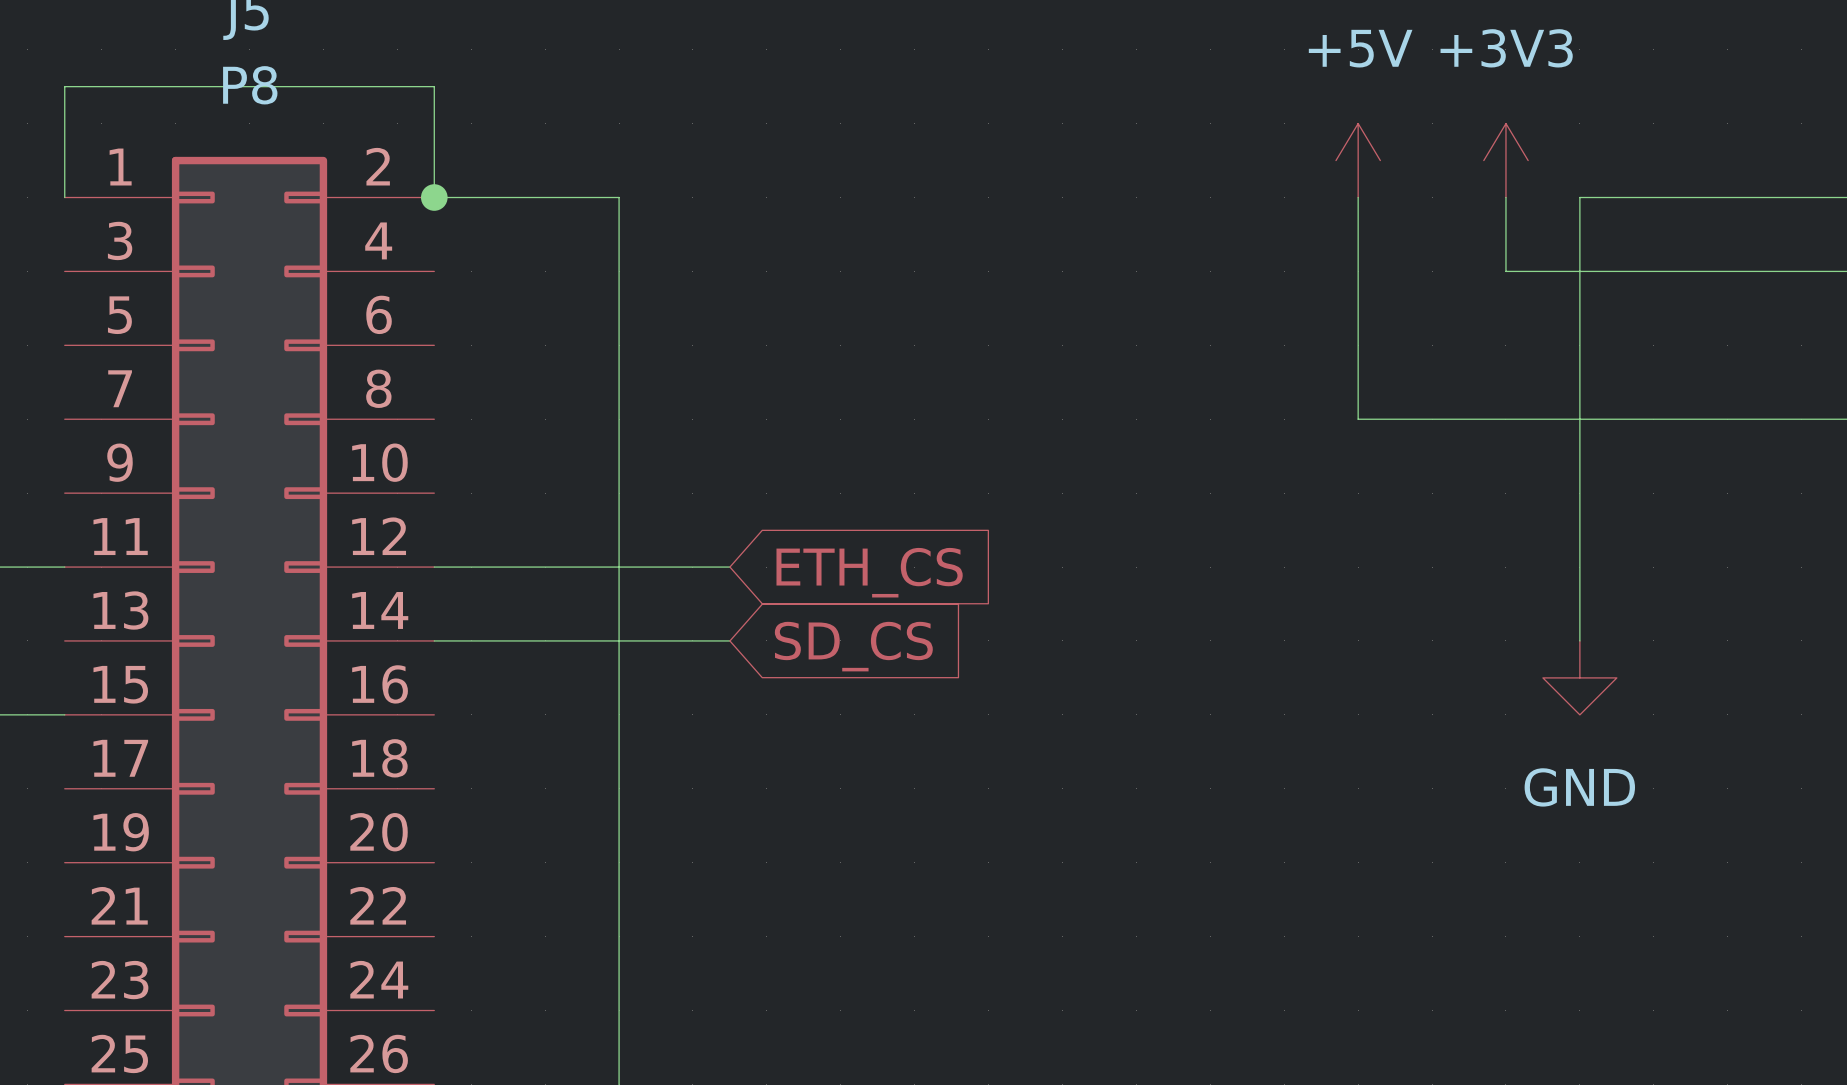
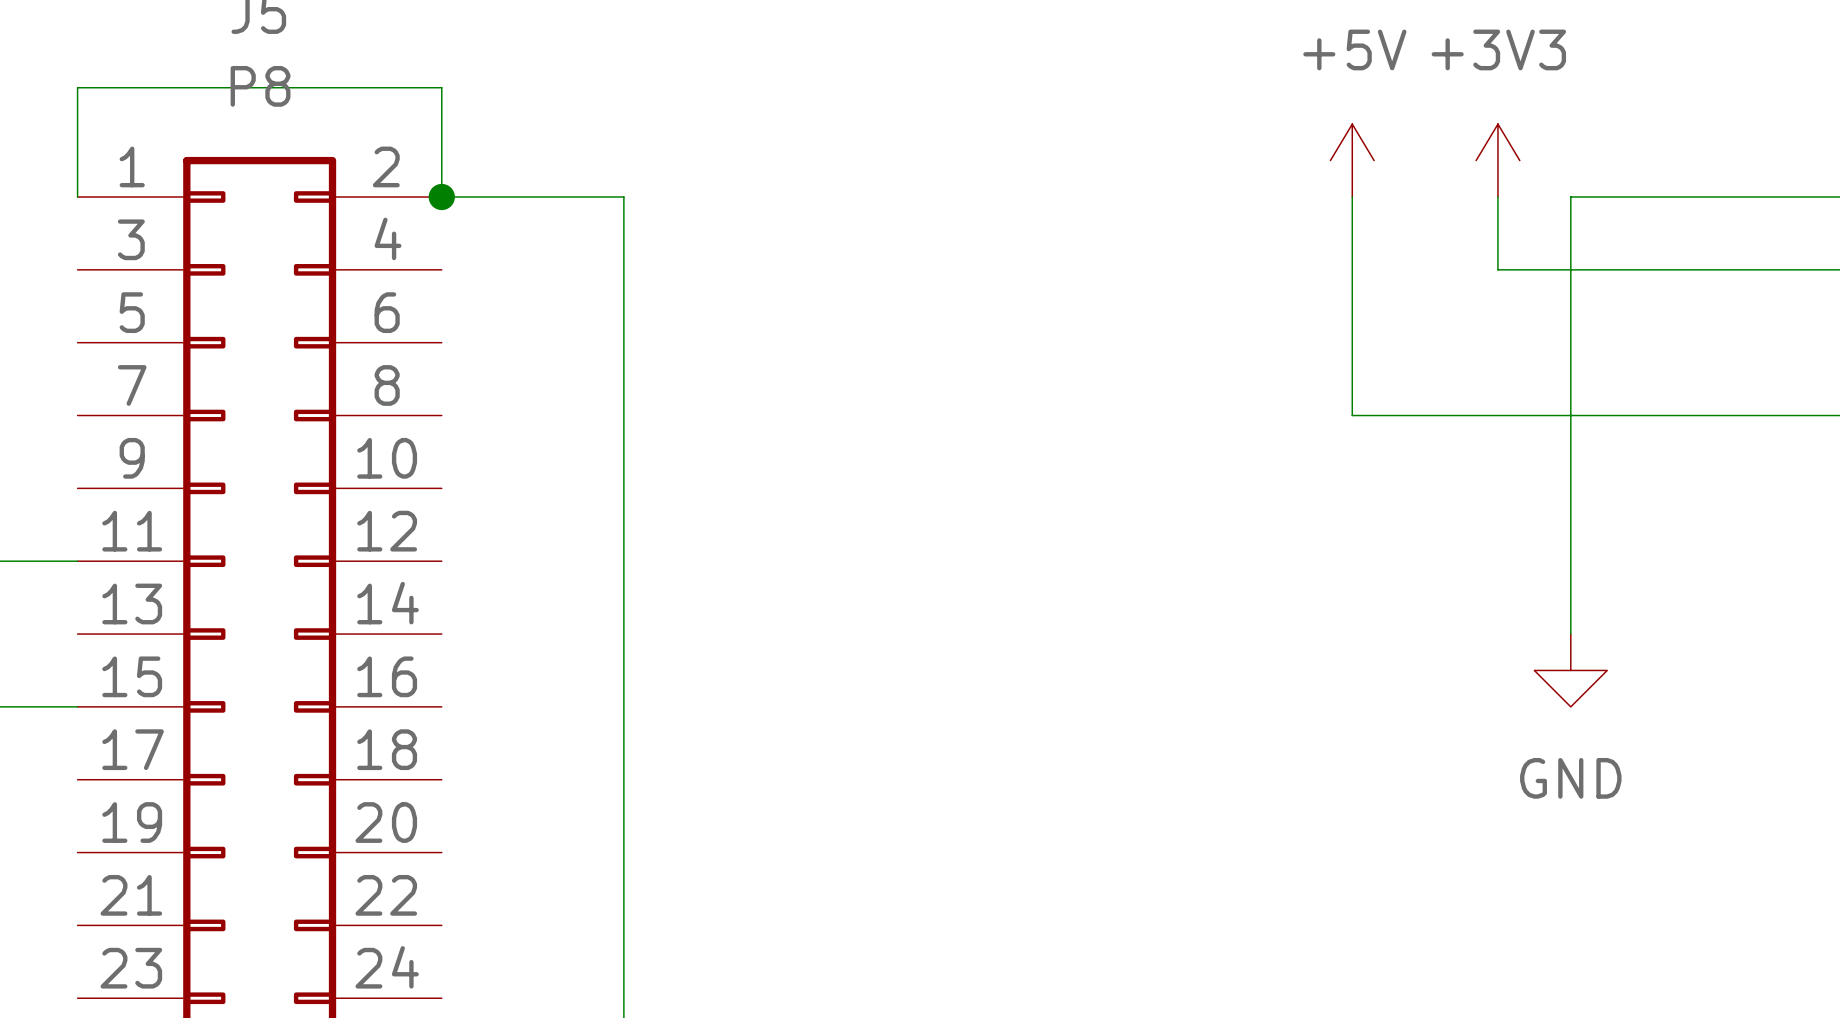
wire: (434, 567) (729, 567) -> none
global label: ETH_CS (869, 572) -> none
wire: (434, 640) (729, 640) -> none
global label: SD_CS (853, 646) -> none

